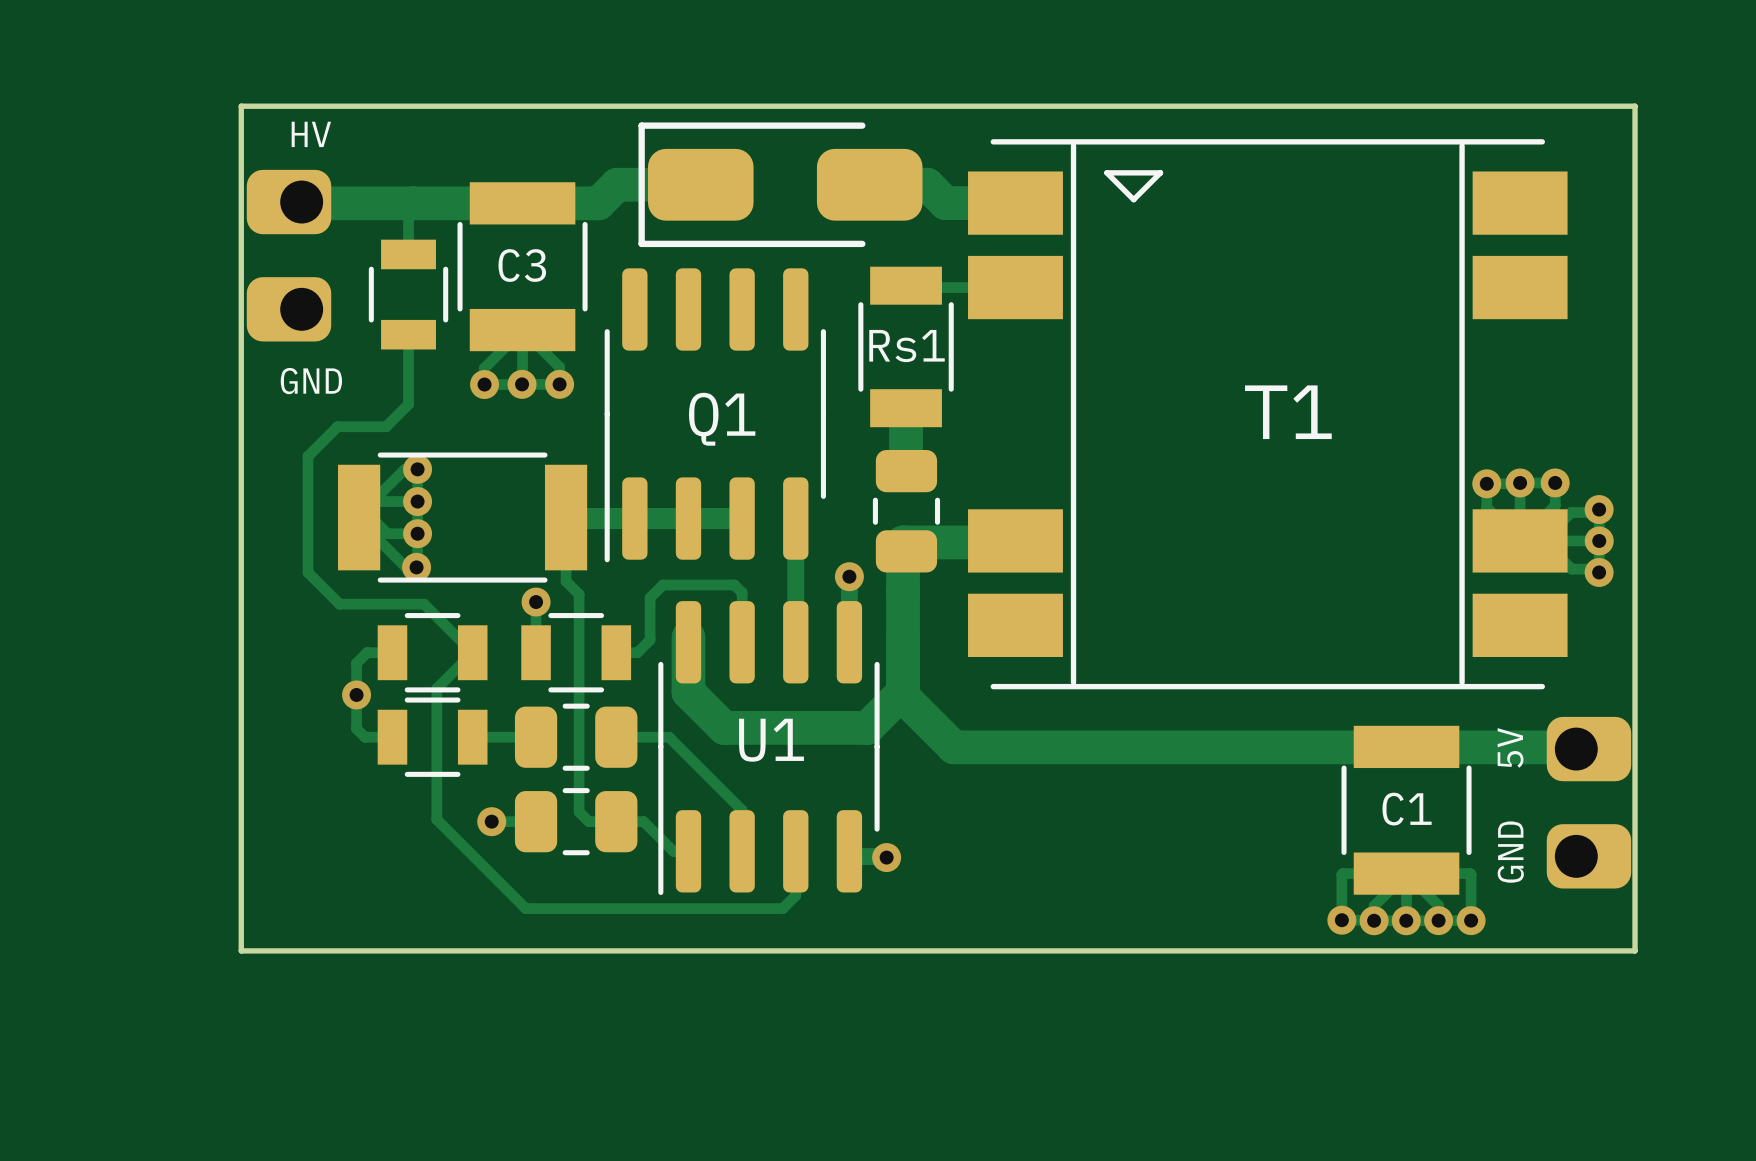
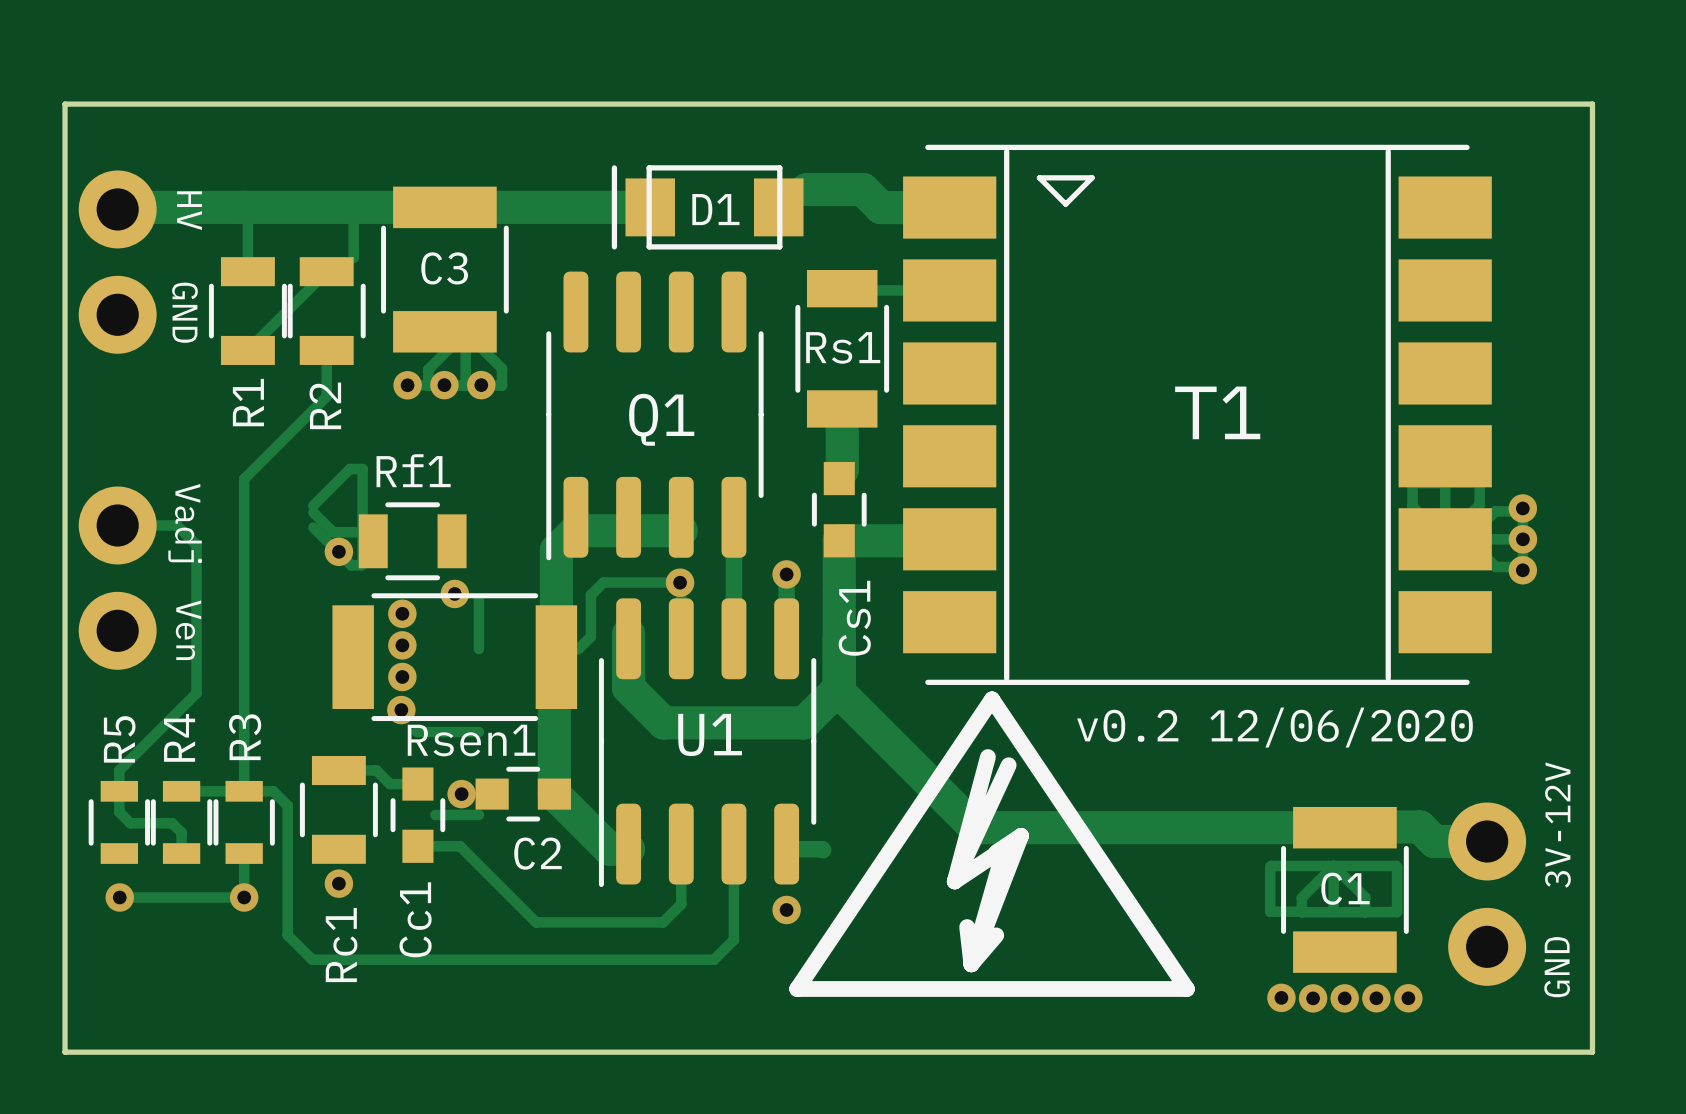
board edge: (241, 106) (241, 950) (1635, 950) (1635, 106) (241, 106) -> (65, 104) (65, 1052) (1592, 1052) (1592, 104) (65, 104)
text rotation: 0° (311, 134) -> 90° clockwise (189, 210)
text position: HV (311, 134) -> HV (189, 210)
T1 footprint: [968, 139, 1568, 690] -> [903, 144, 1492, 685]
track: (700, 184) (617, 184) (598, 203) (310, 203) -> none
part: (780, 184) -> none
track: none -> (125, 201) (117, 209) (119, 207) (650, 207)
track: none -> (243, 207) (247, 211) (247, 271)
D1: none -> (707, 207)
part: (288, 255) -> none
part: none -> (117, 262)
C3 position: (522, 266) -> (444, 269)
track: none -> (326, 271) (247, 350)
R2 position: (408, 294) -> (326, 311)
R1: none -> (247, 311)
track: (408, 334) (408, 404) (386, 426) (337, 426) (308, 456) (308, 572) (339, 604) (424, 604) (472, 652) (436, 688) (436, 819) (525, 908) (782, 908) (795, 895) -> (181, 791) (273, 791) (287, 805) (287, 935) (312, 959) (714, 959) (733, 939) (733, 887)
track: none -> (326, 350) (326, 396) (244, 479) (244, 791)
text rotation: 0° (311, 381) -> 90° clockwise (184, 312)
text position: GND (311, 381) -> GND (184, 312)
via: none -> (444, 385)
via: none -> (481, 385)
via: none -> (407, 385)
via: (484, 384) -> none
via: (522, 384) -> none
via: (559, 384) -> none
R2 name: none -> R2 (325, 405)
via: (417, 469) -> none
via: (1520, 482) -> none
via: (1555, 482) -> none
via: (1486, 483) -> none
track: (379, 501) (417, 501) -> none
via: (417, 501) -> none
Cs1: none -> (839, 509)
part: (906, 511) -> none
part: (462, 517) -> none
track: (566, 517) (566, 581) (579, 594) (579, 811) (588, 821) (643, 821) (673, 851) (688, 851) -> none
track: (567, 518) (742, 518) -> none
text: none -> Vadj (185, 523)
track: none -> (117, 525) (177, 525) (196, 544) (196, 693) (119, 770) (119, 812) (130, 823) (172, 823) (181, 832) (181, 853)
track: none -> (681, 530) (575, 530) (556, 550) (554, 794) (609, 849) (628, 849)
via: (417, 533) -> none
Rf1: none -> (412, 541)
via: none -> (338, 551)
via: (416, 567) -> none
part: none -> (117, 578)
via: none -> (680, 582)
via position: (536, 602) -> (454, 593)
via: none -> (402, 613)
text: none -> Ven (188, 630)
via: none -> (402, 645)
track: (392, 652) (367, 652) (356, 663) (356, 728) (365, 737) (392, 737) -> none
part: (432, 652) -> none
part: (576, 652) -> none
Rsen1: none -> (454, 657)
via: none -> (402, 676)
via: (356, 694) -> none
drawing: none -> [789, 691, 1195, 997]
via: none -> (401, 710)
text: none -> v0.2 12/06/2020 (1274, 727)
part: (432, 737) -> none
part: (576, 737) -> none
track: (616, 737) (669, 737) (742, 810) (742, 851) -> none
track: (1561, 746) (953, 747) -> (1487, 841) (1434, 841) (1419, 826) (974, 827) (889, 741)
text: 5V (1510, 747) -> none
track: none -> (338, 770) (376, 770) (389, 784) (417, 784)
C2: none -> (523, 794)
part: (1588, 802) -> none
C1 position: (1406, 810) -> (1344, 889)
Rc1: none -> (338, 809)
Cc1: none -> (417, 815)
via position: (491, 821) -> (461, 794)
part: (576, 821) -> none
R5: none -> (119, 822)
R4: none -> (181, 822)
R3: none -> (244, 822)
text: none -> 3V-12V (1557, 825)
text position: GND (1510, 852) -> GND (1557, 967)
track: none -> (417, 846) (460, 846) (536, 922) (663, 922) (681, 904) (681, 849)
via position: (886, 857) -> (786, 909)
track: none -> (242, 852) (244, 897) (119, 897)
via: none -> (338, 883)
part: none -> (1487, 894)
via: none -> (119, 897)
via: none -> (244, 897)
via: (1341, 920) -> none
via: (1374, 920) -> none
via: (1406, 920) -> none
via: (1438, 920) -> none
via: (1471, 920) -> none
via: none -> (1281, 997)
via: none -> (1313, 998)
via: none -> (1344, 998)
via: none -> (1376, 998)
via: none -> (1408, 998)

